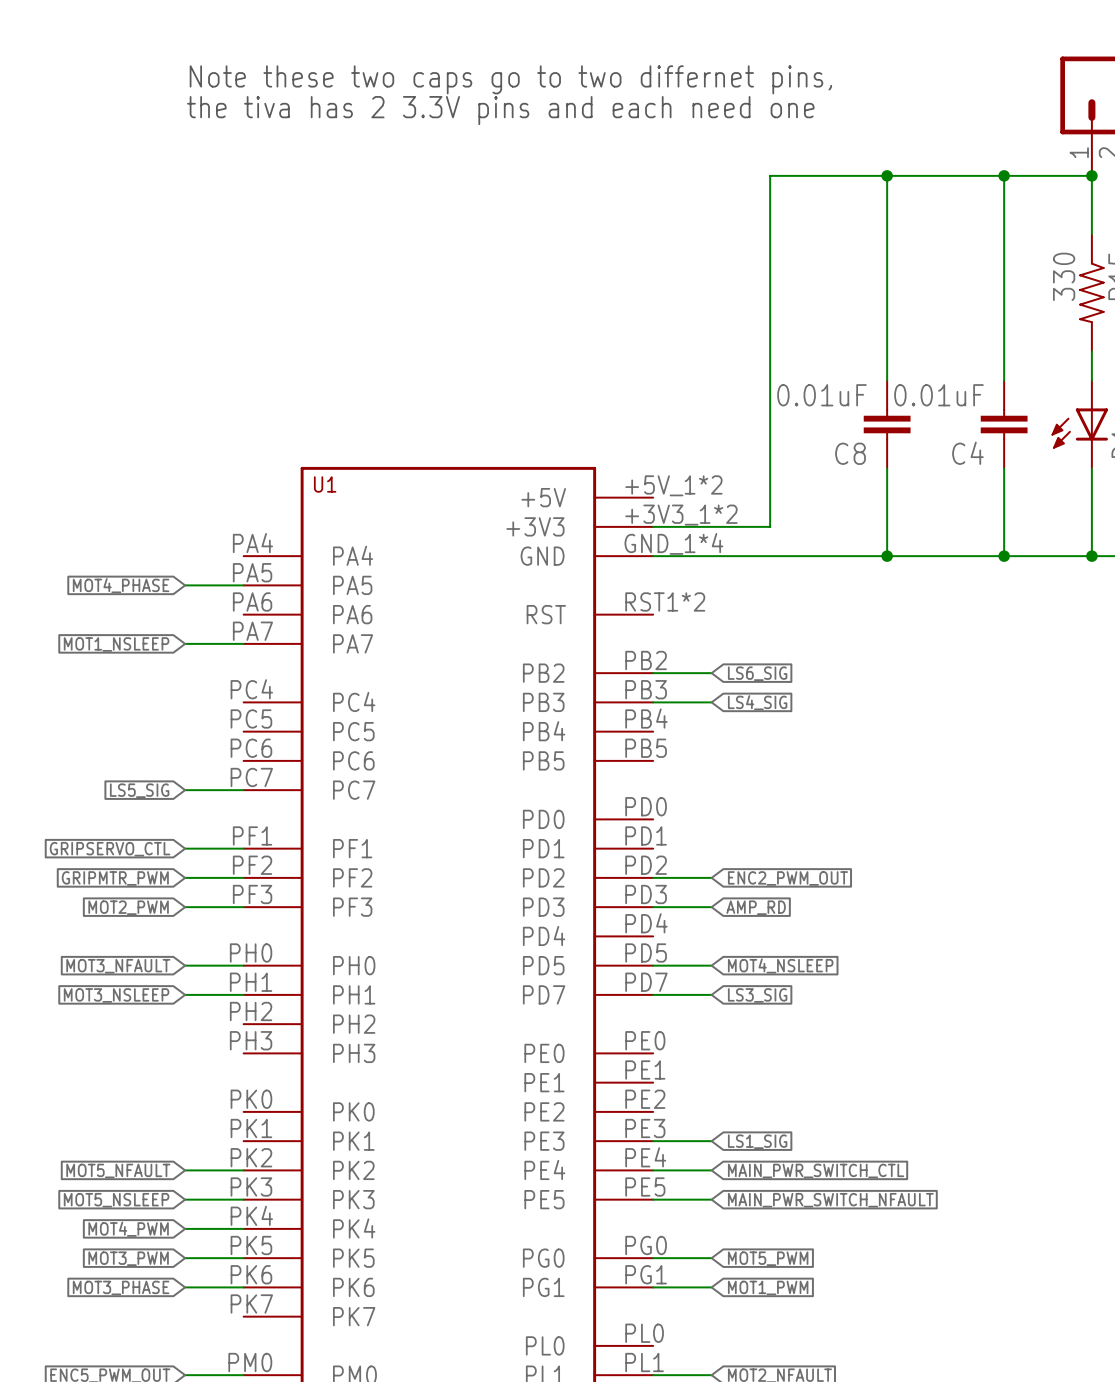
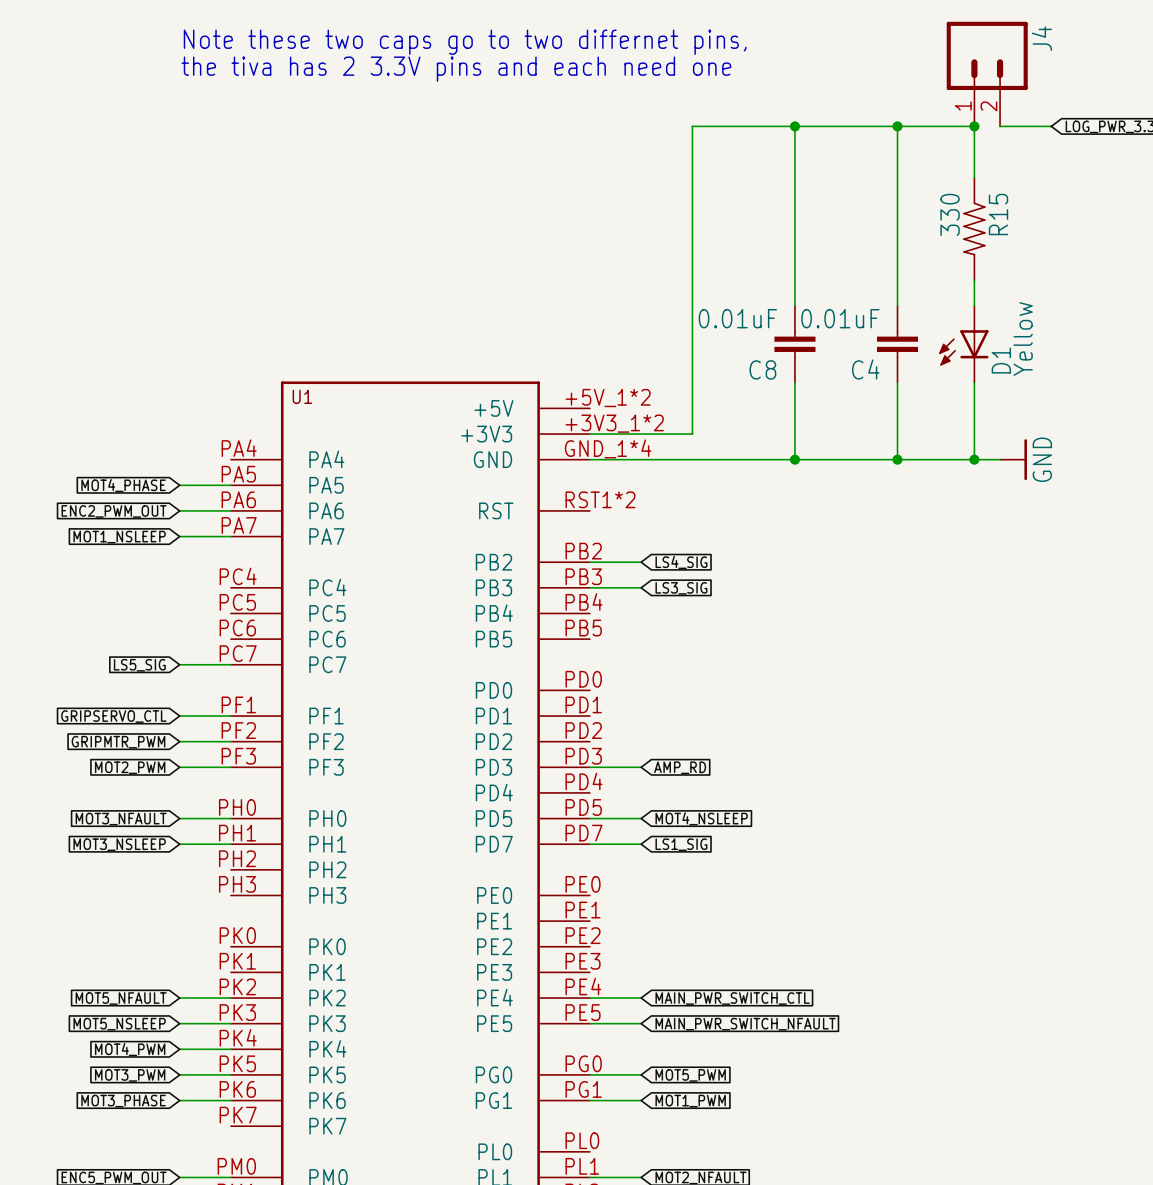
wire: none -> (179, 510) (230, 510)
global label: none -> ENC2_PWM_OUT (114, 511)
global label: LS6_SIG (757, 673) -> LS4_SIG (681, 562)
global label: LS4_SIG (757, 702) -> LS3_SIG (681, 588)
wire: (653, 877) (711, 877) -> none
global label: ENC2_PWM_OUT (787, 878) -> none
global label: LS3_SIG (757, 995) -> LS1_SIG (681, 844)
wire: (653, 1141) (711, 1141) -> none
global label: LS1_SIG (757, 1141) -> none

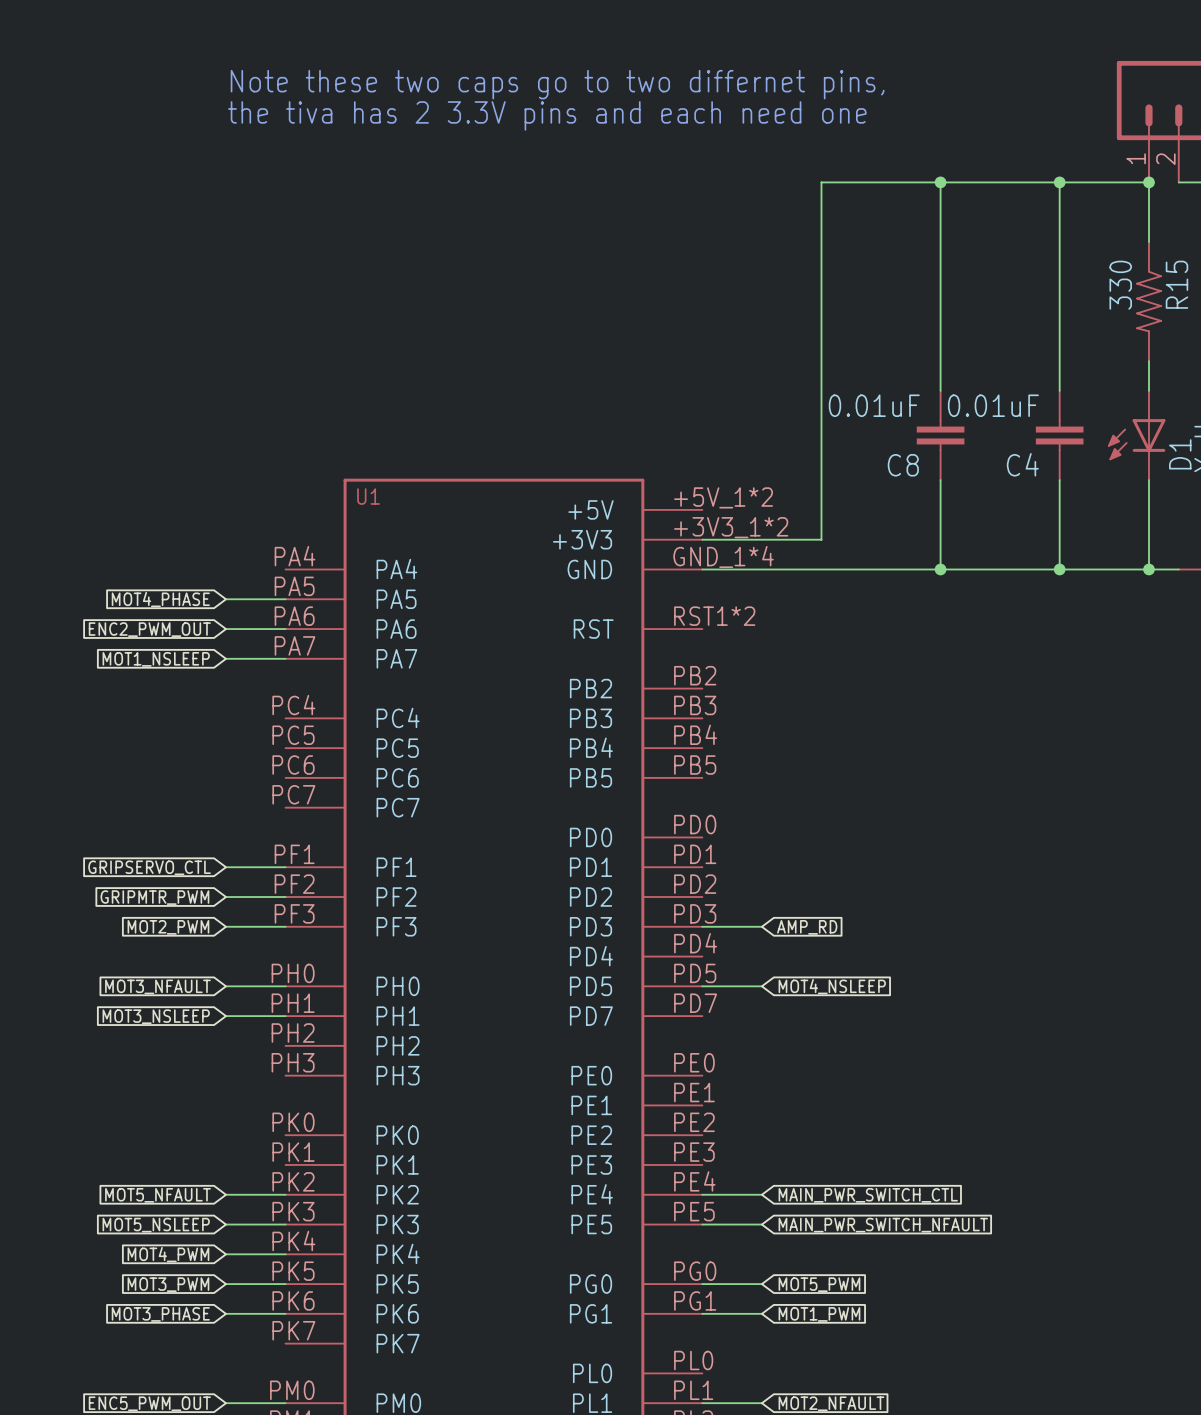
wire: (589, 562) (641, 562) -> none
global label: LS4_SIG (681, 562) -> none
wire: (589, 587) (641, 587) -> none
global label: LS3_SIG (681, 588) -> none
wire: (179, 664) (230, 664) -> none
global label: LS5_SIG (139, 665) -> none
wire: (589, 844) (641, 844) -> none
global label: LS1_SIG (681, 844) -> none

